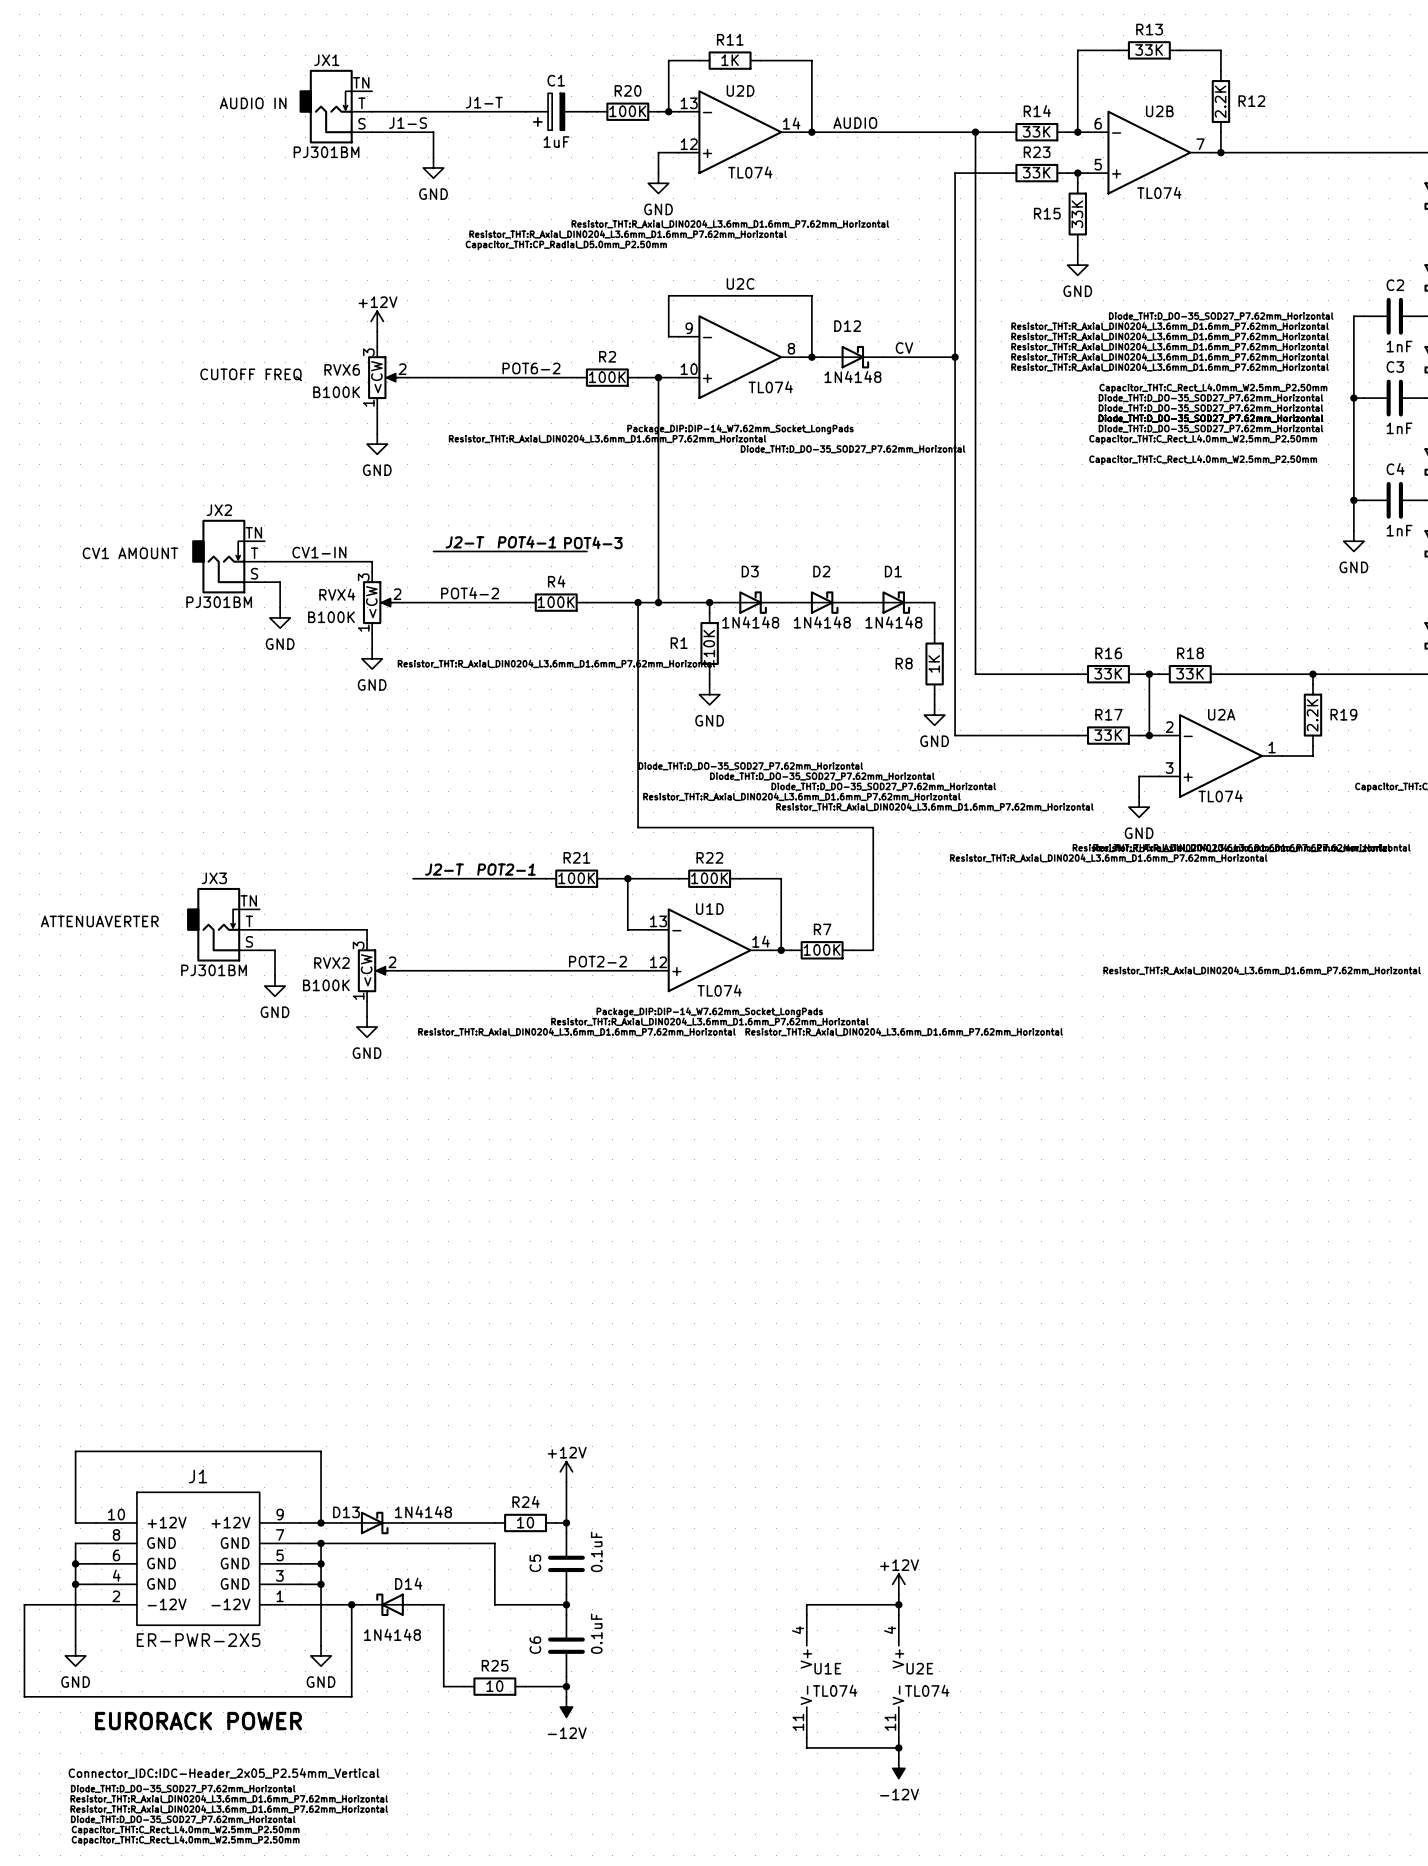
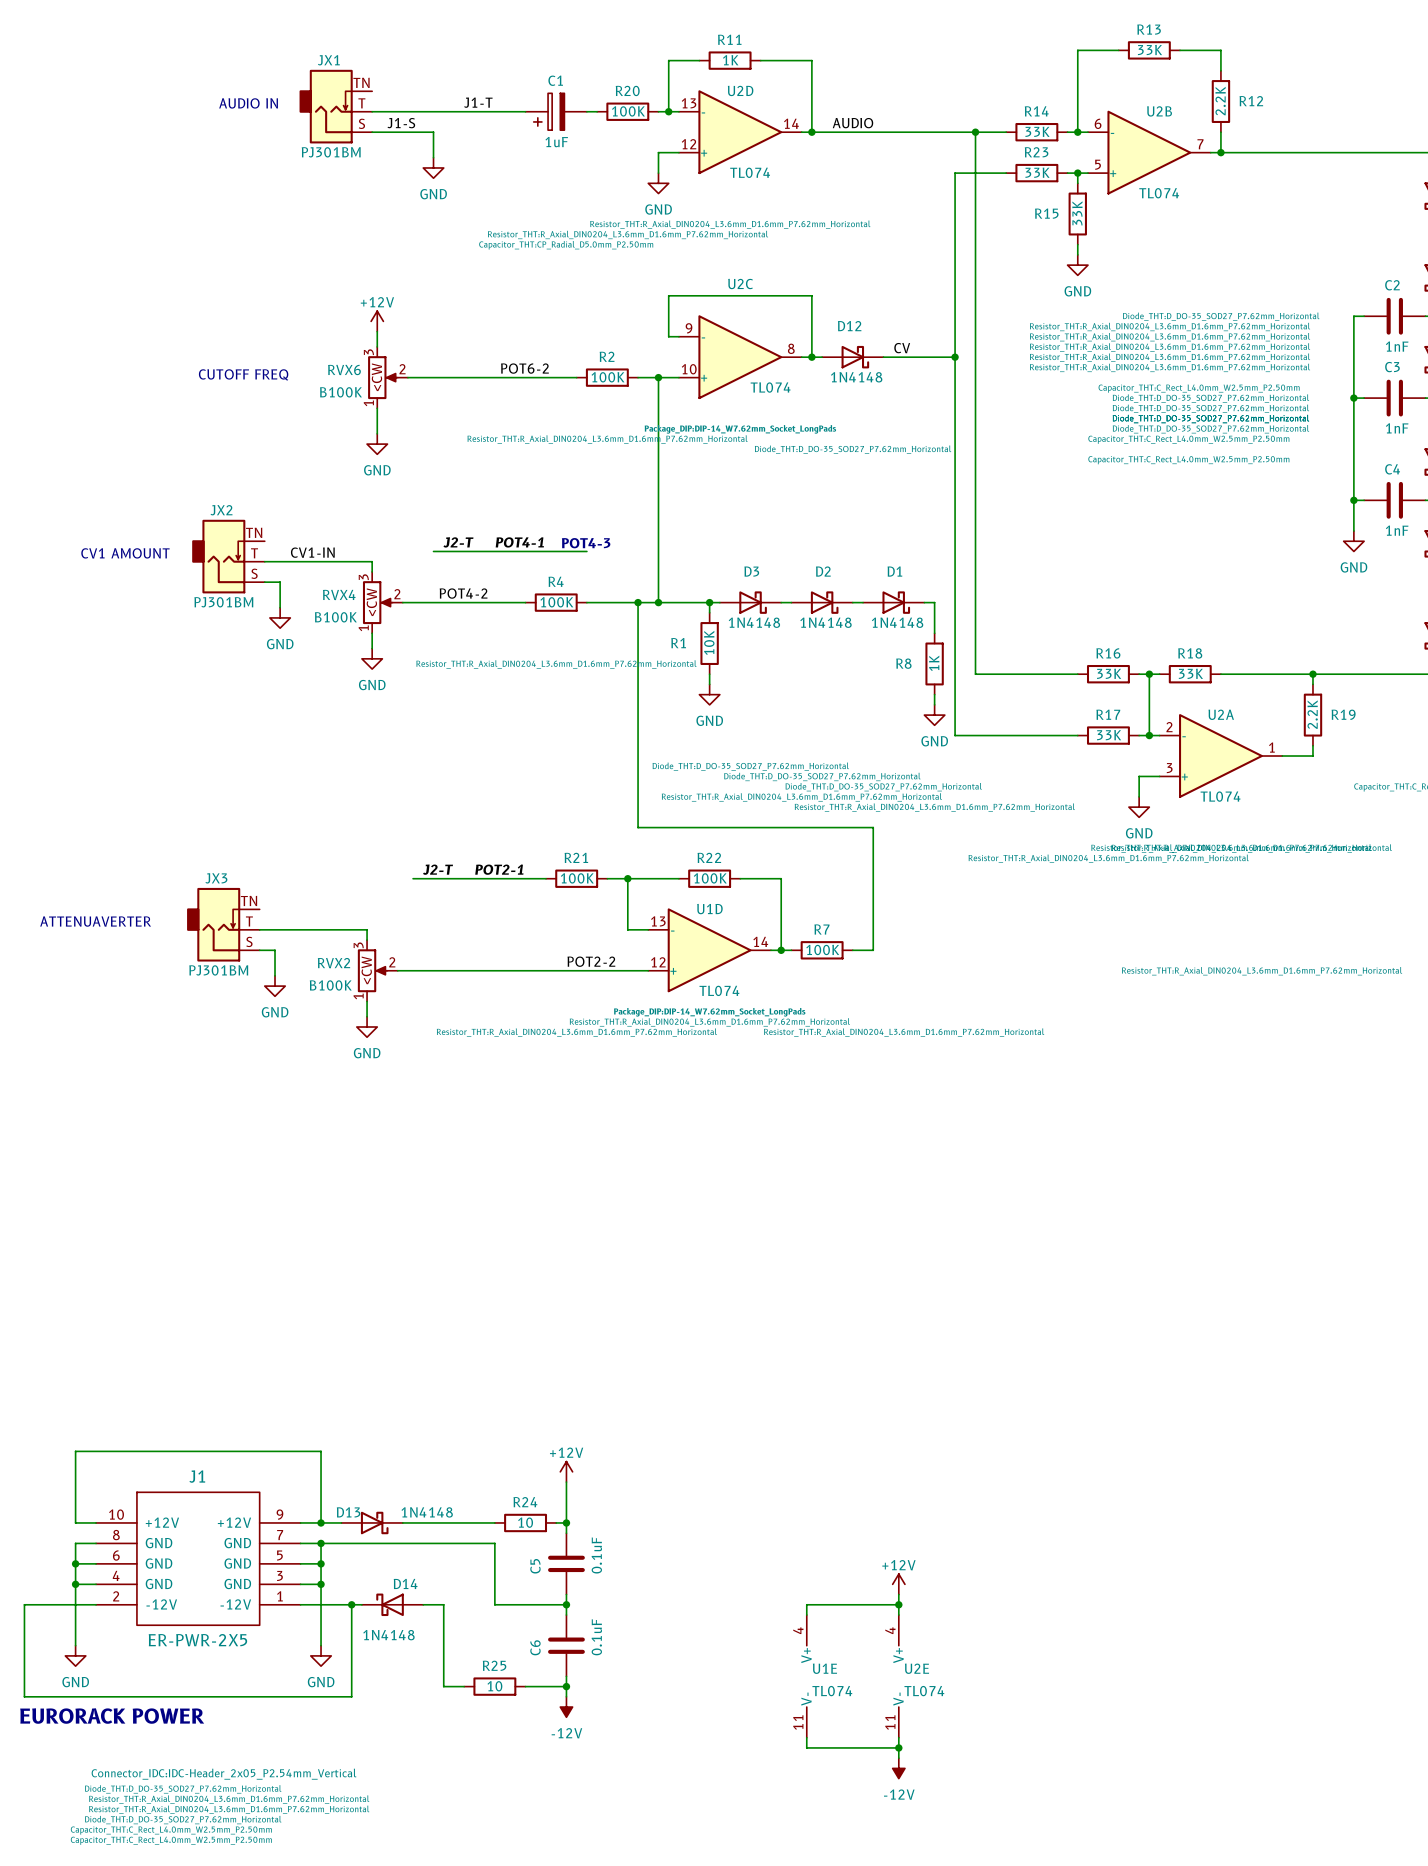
text position: EURORACK POWER (198, 1721) -> EURORACK POWER (112, 1716)

